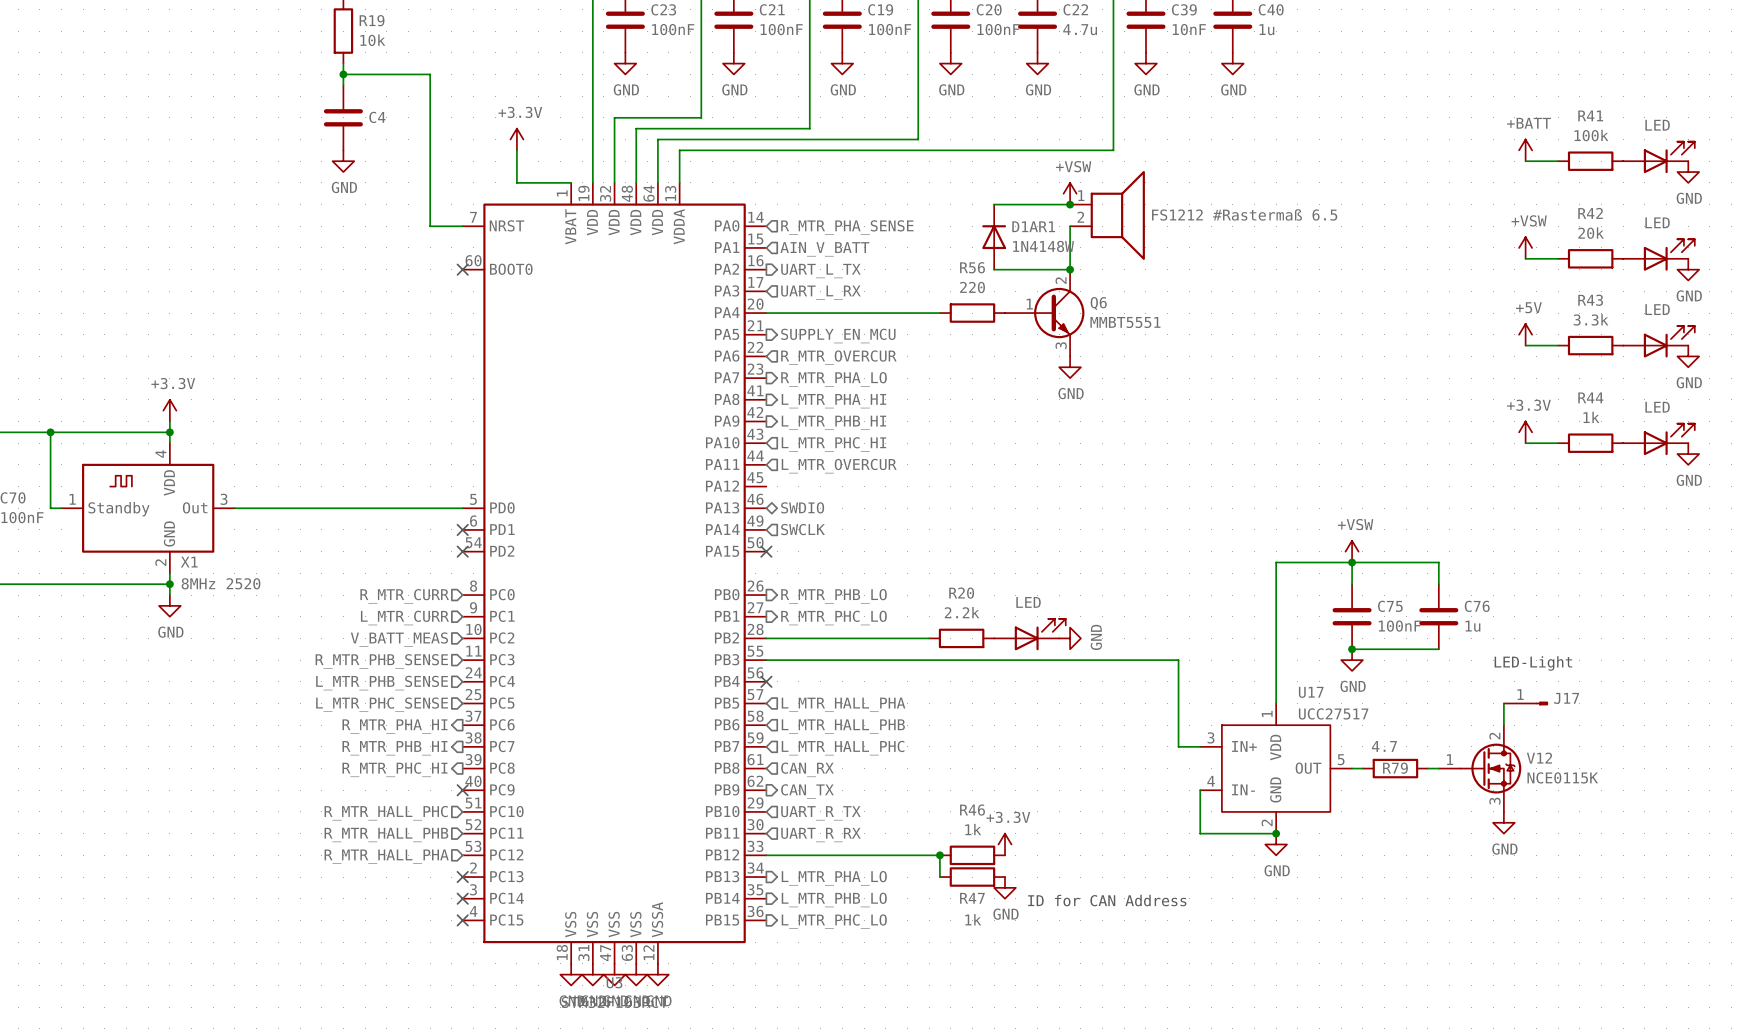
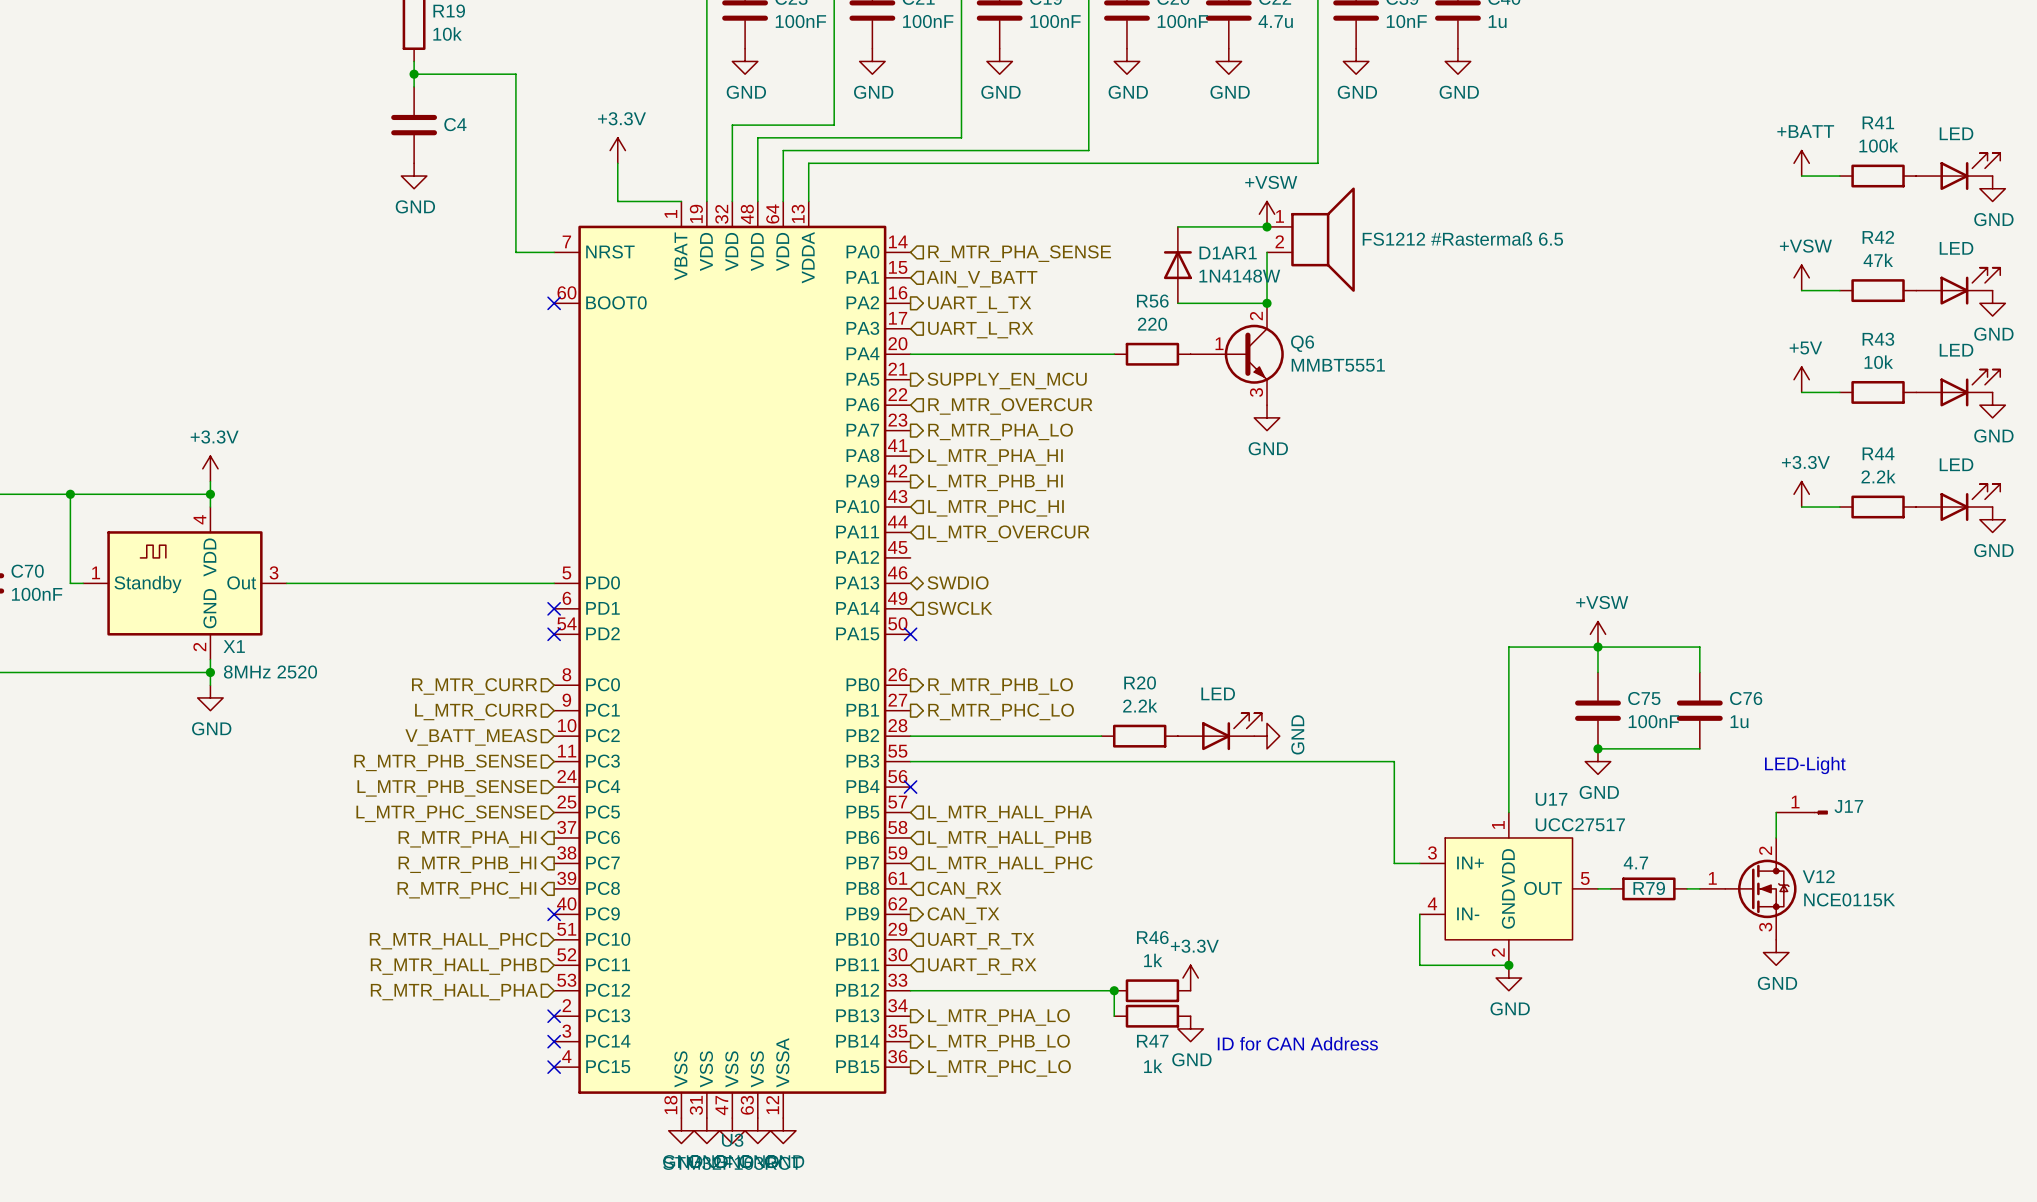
R42 value: 20k (1591, 233) -> 47k (1878, 260)
R43 value: 3.3k (1591, 319) -> 10k (1878, 362)
R44 value: 1k (1591, 417) -> 2.2k (1878, 476)

